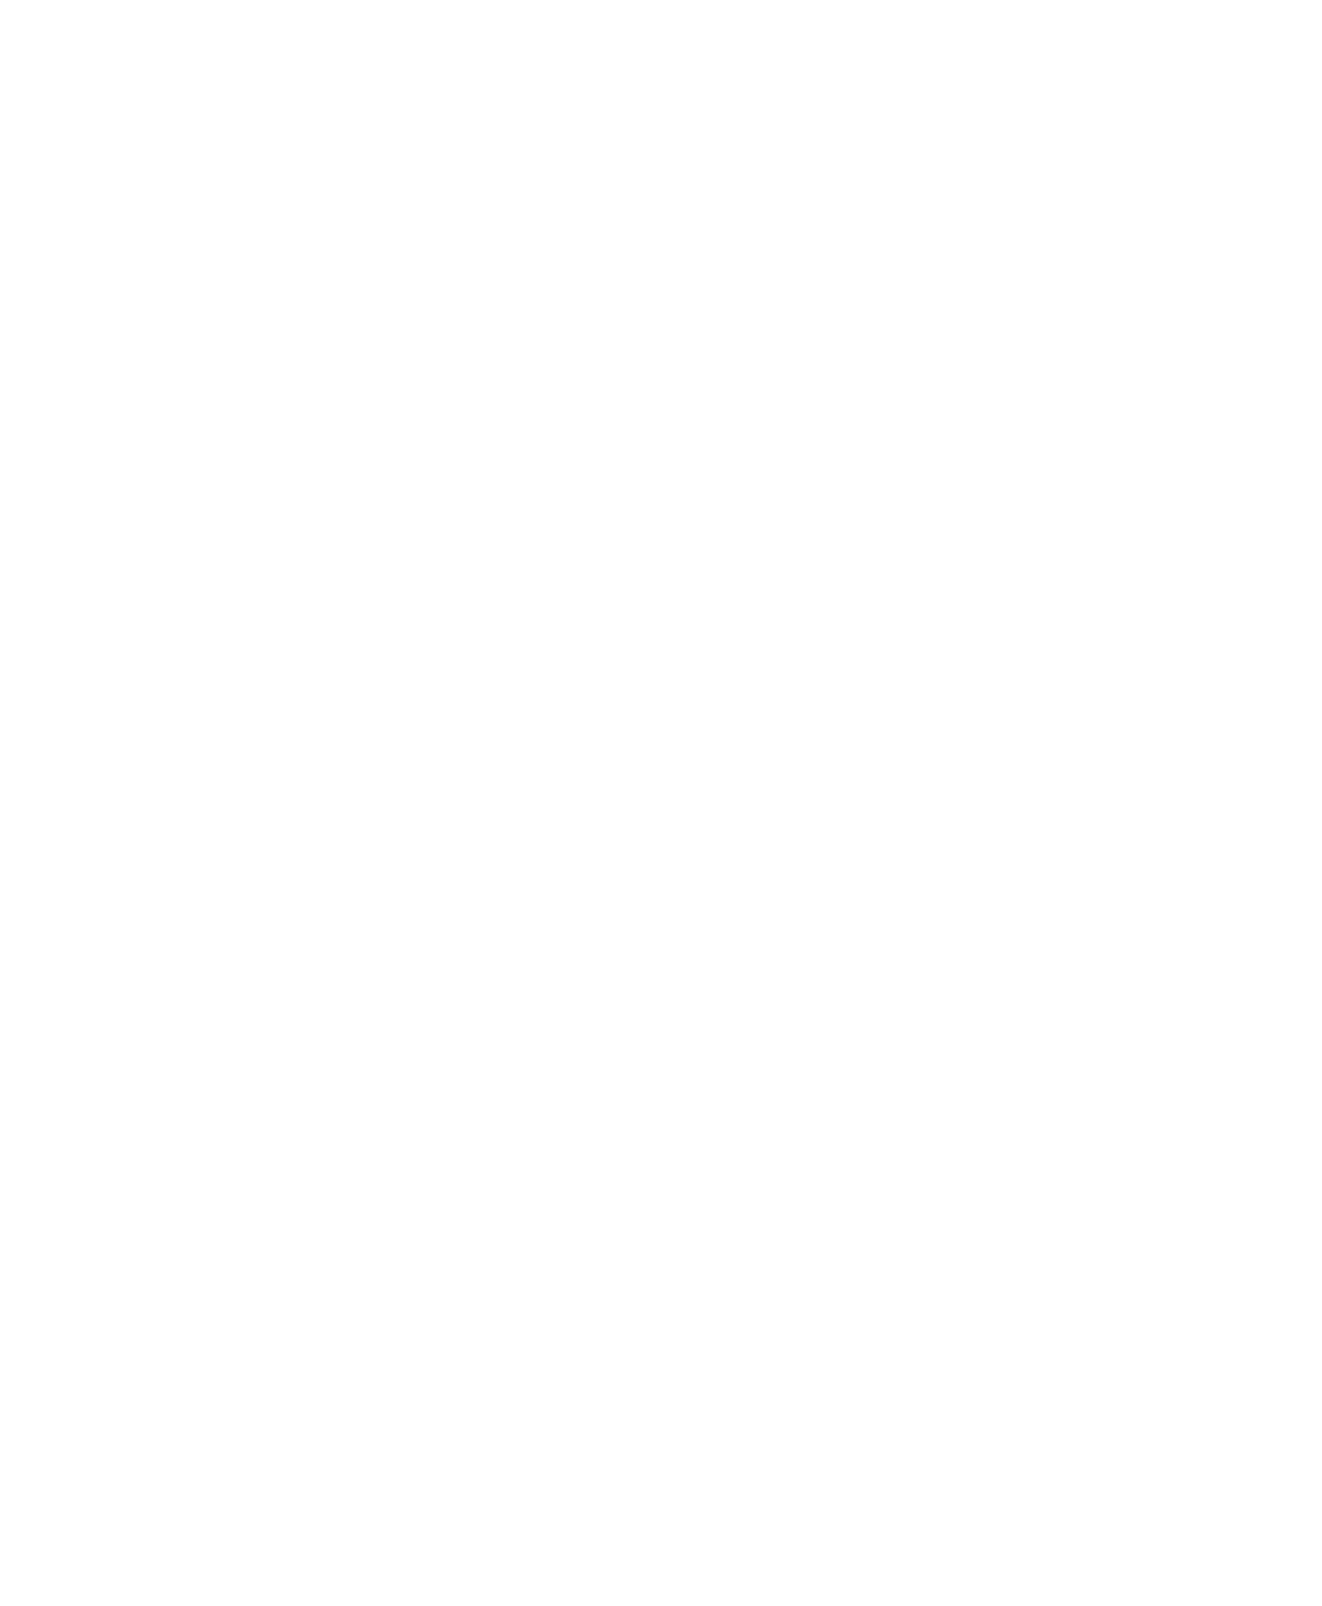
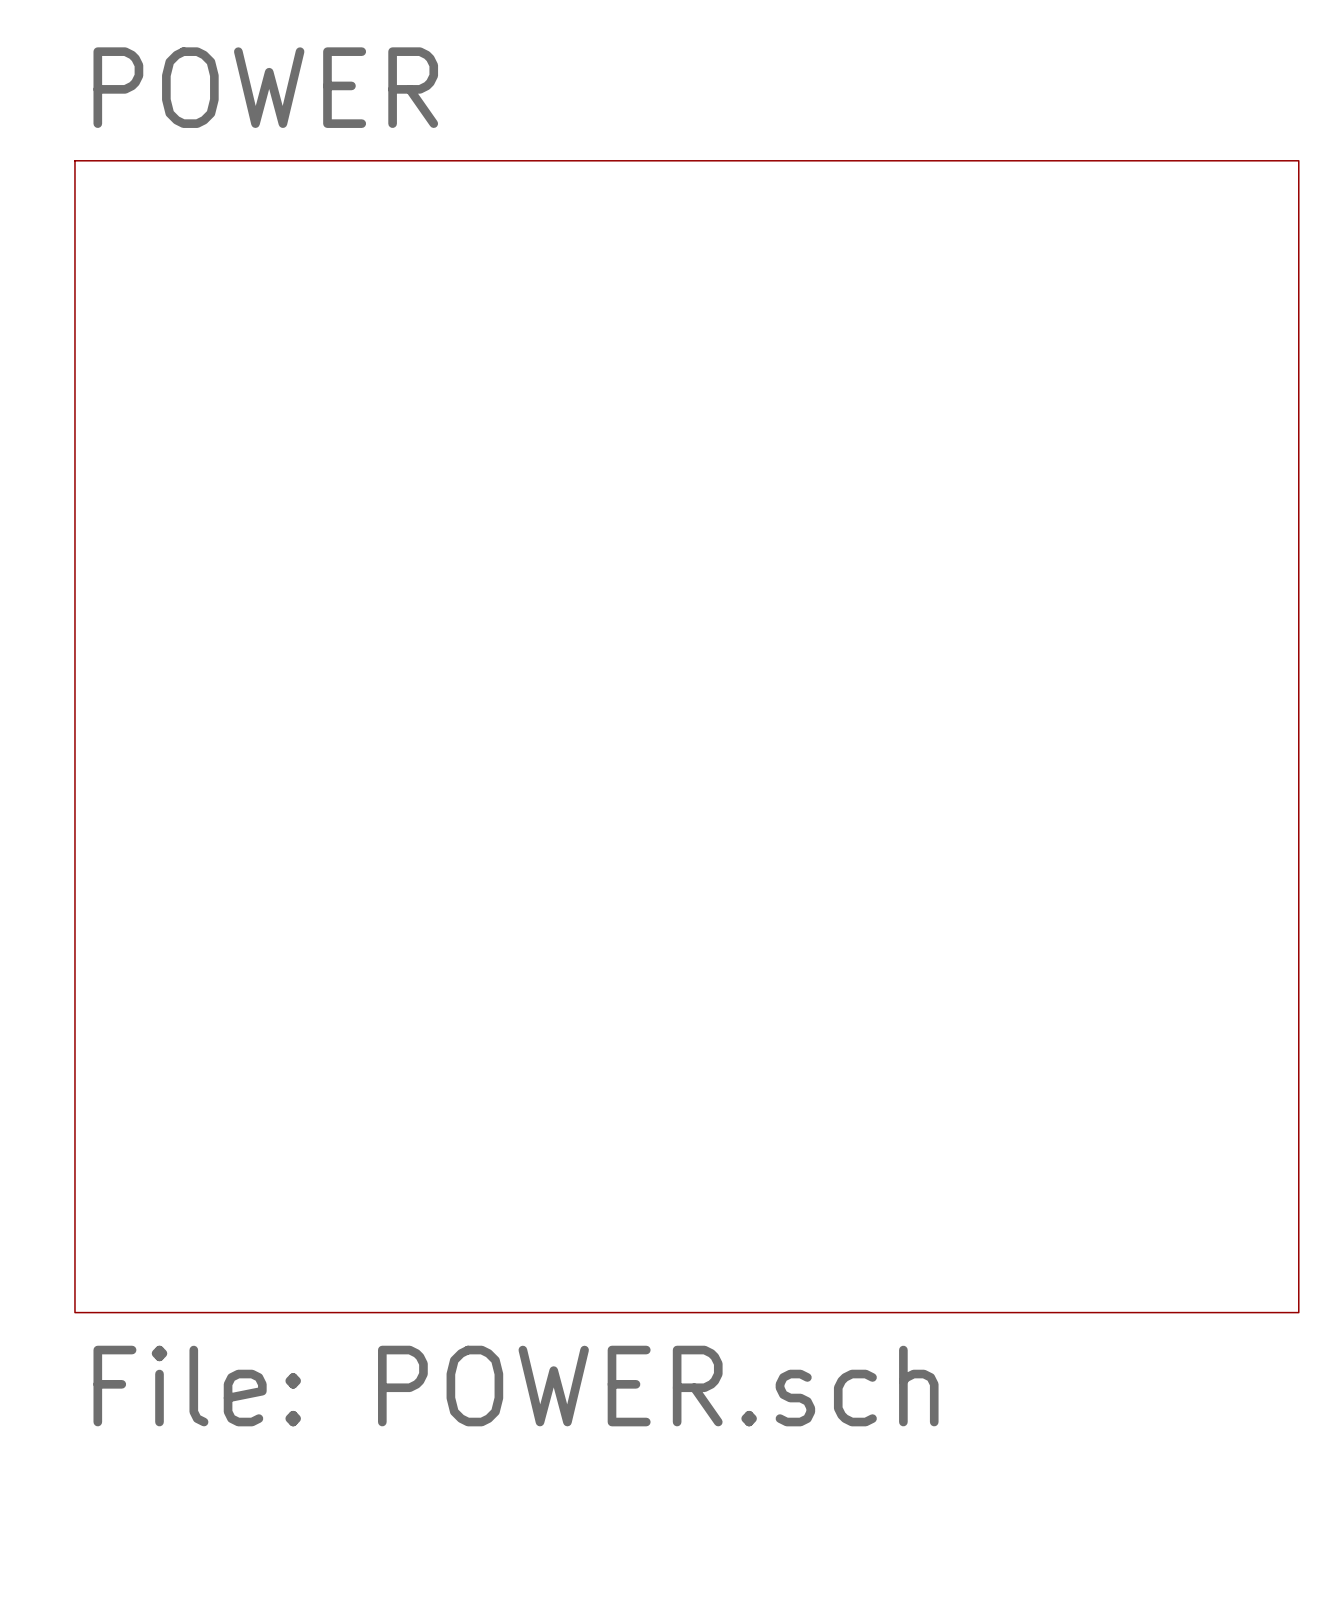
sheet POWER: none -> File: POWER.sch (686, 736)

